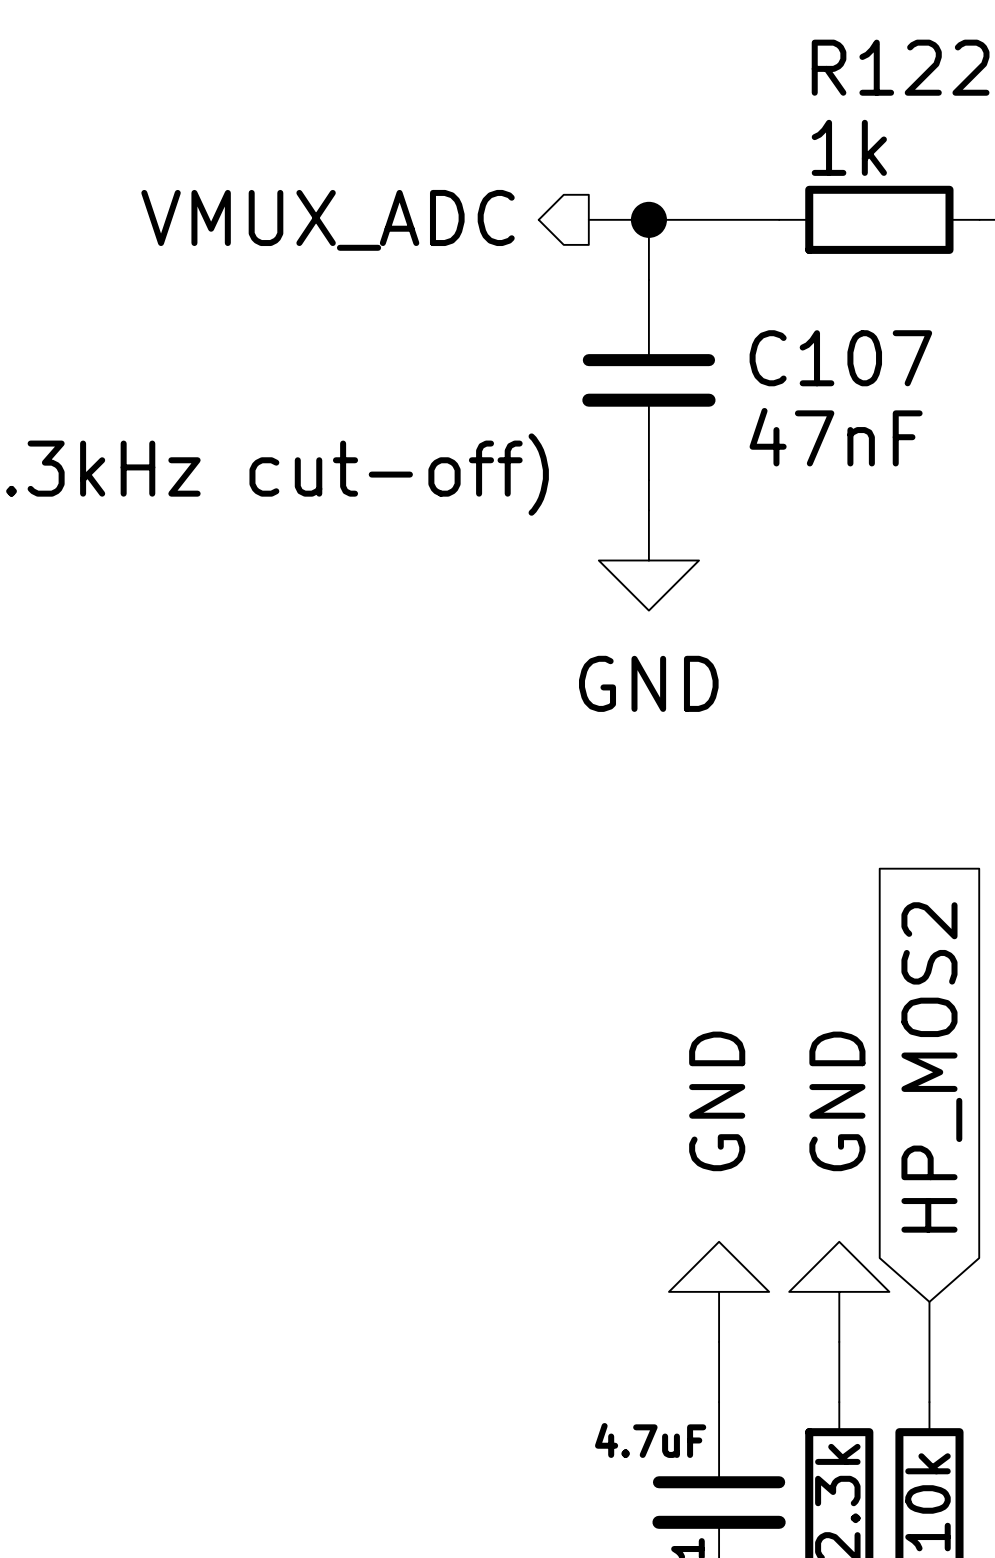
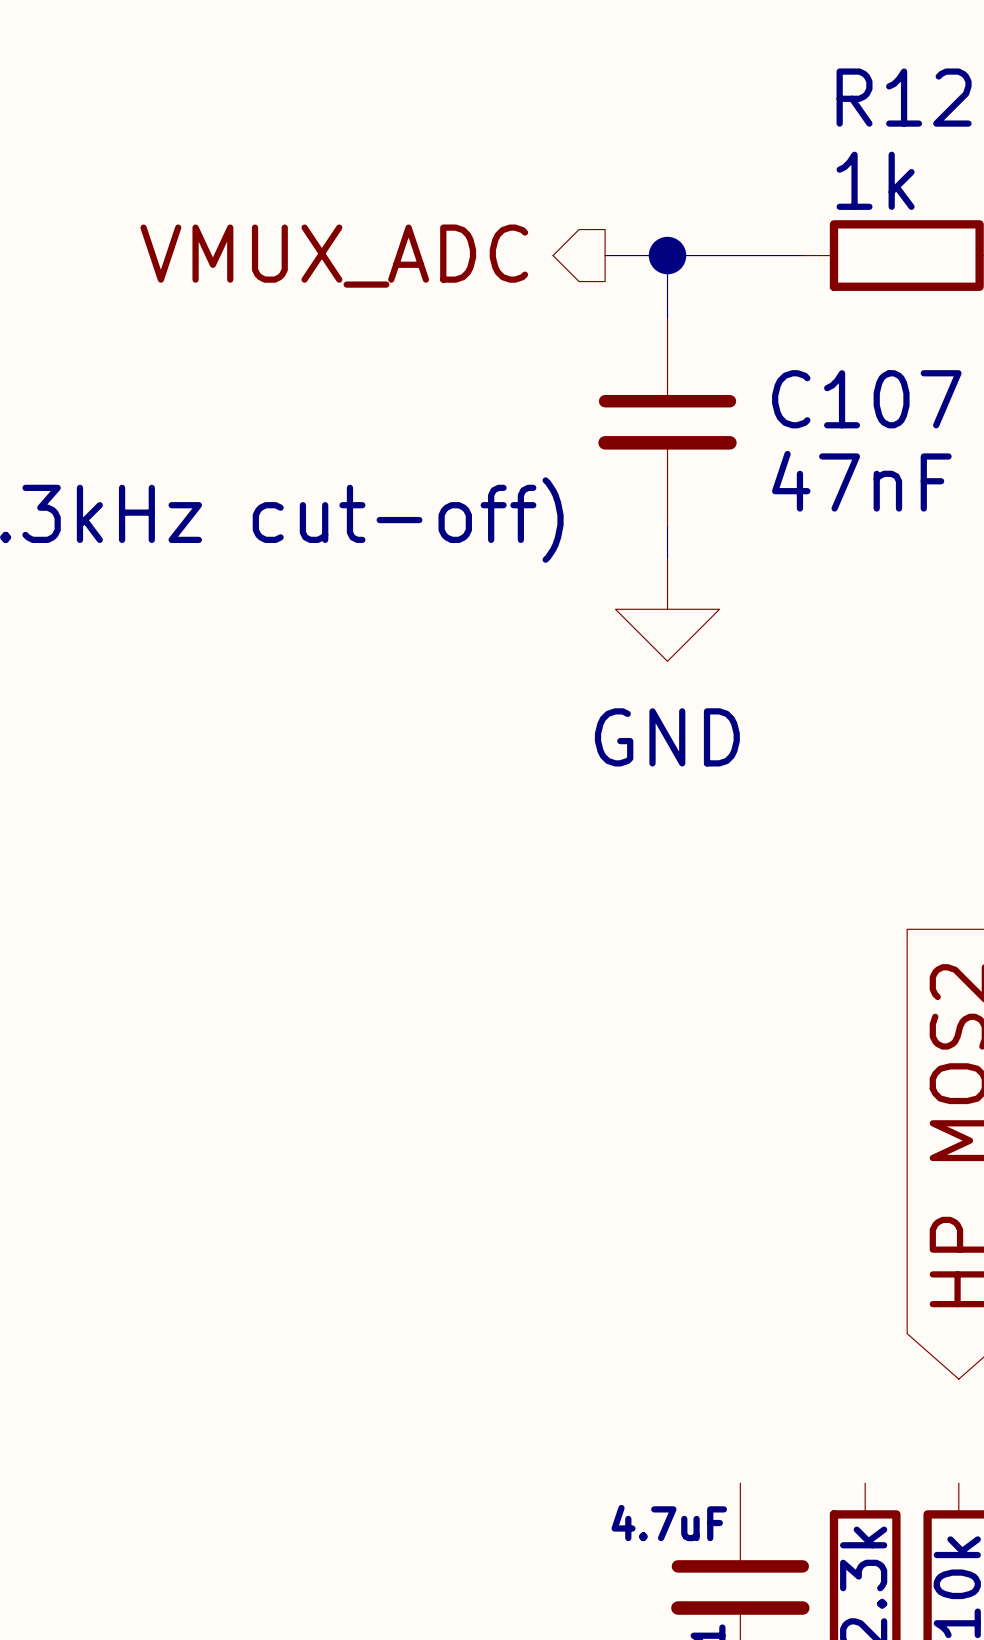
power symbol: GND (719, 1291) -> none
power symbol: GND (839, 1291) -> none
wire: (929, 1301) (929, 1402) -> none
wire: (719, 1341) (719, 1402) -> none
wire: (839, 1341) (839, 1402) -> none

